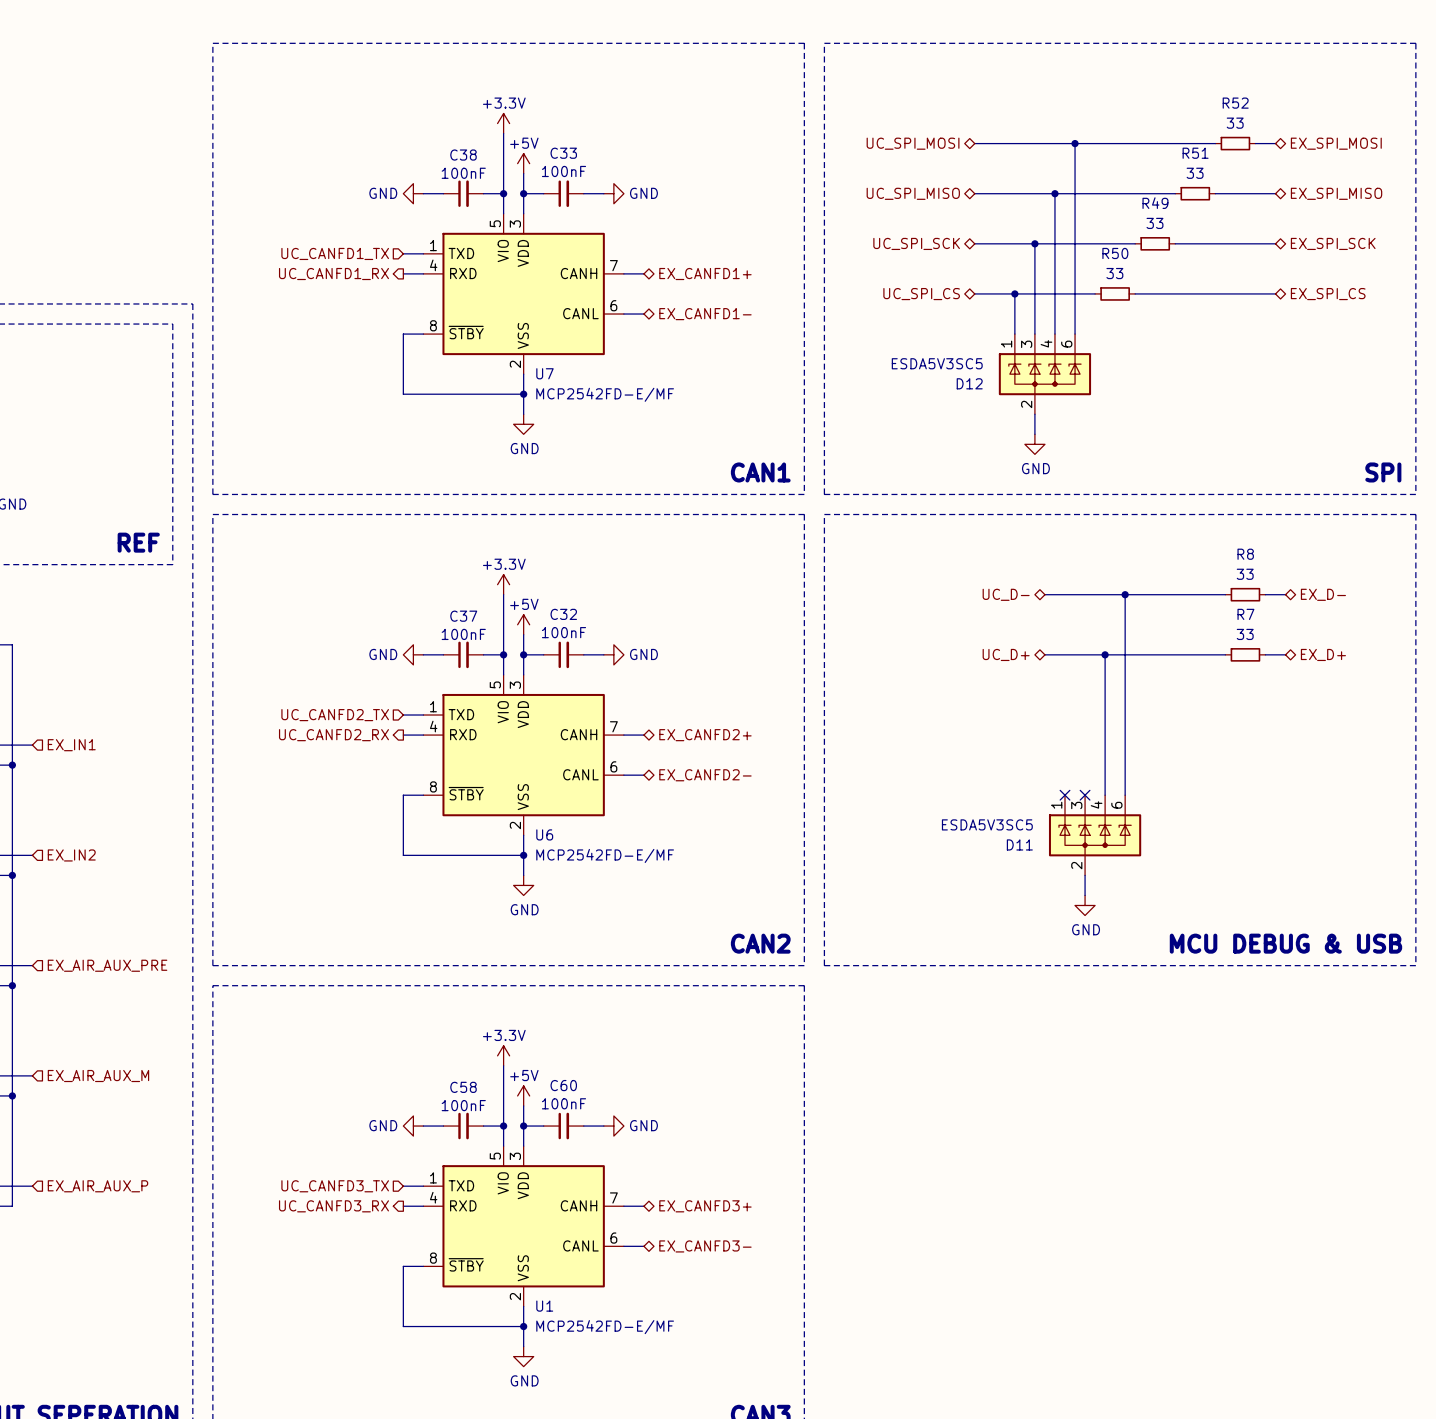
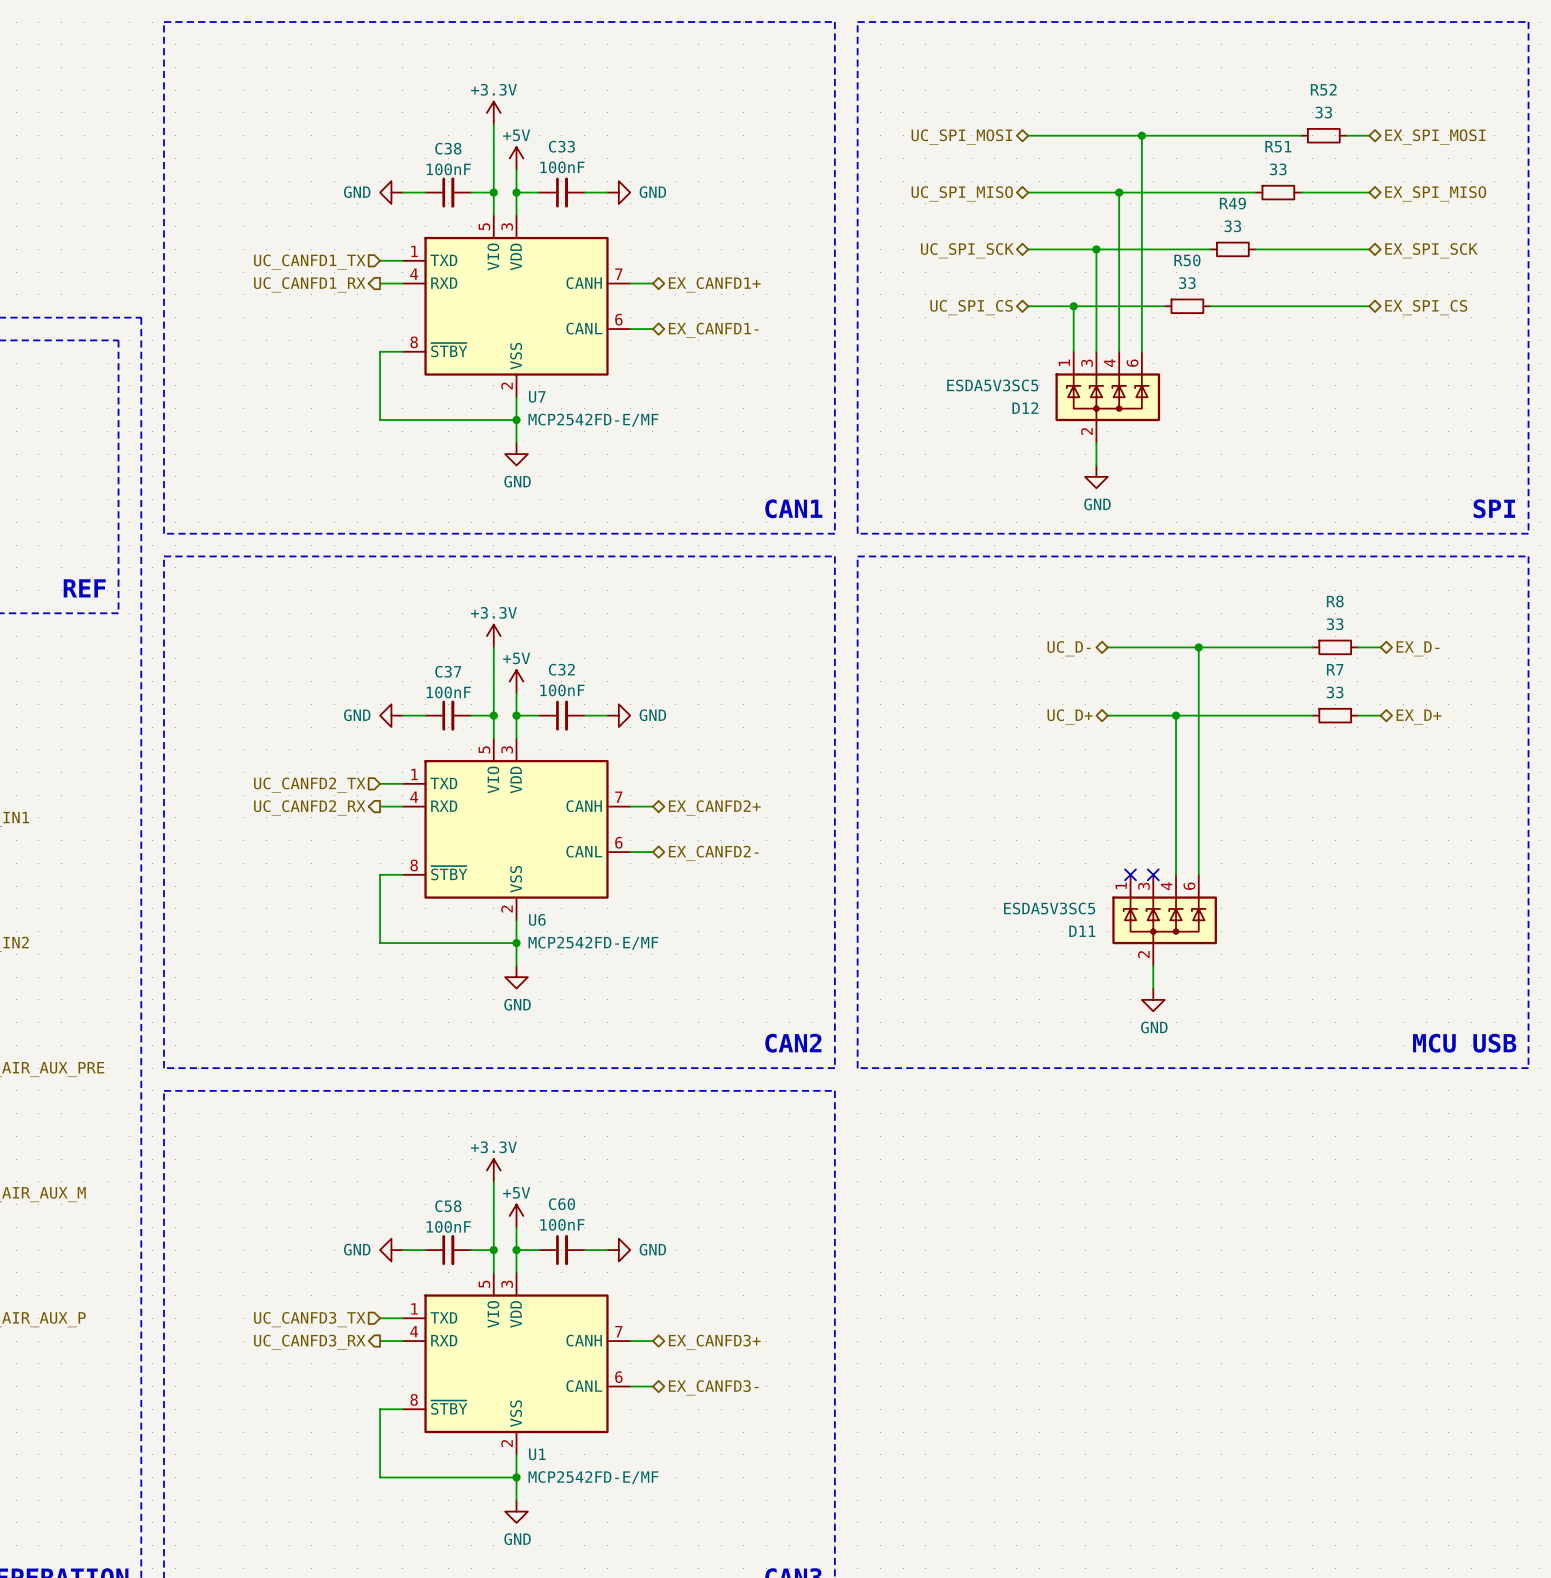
text: MCU DEBUG & USB (1285, 943) -> MCU USB (1464, 1043)

